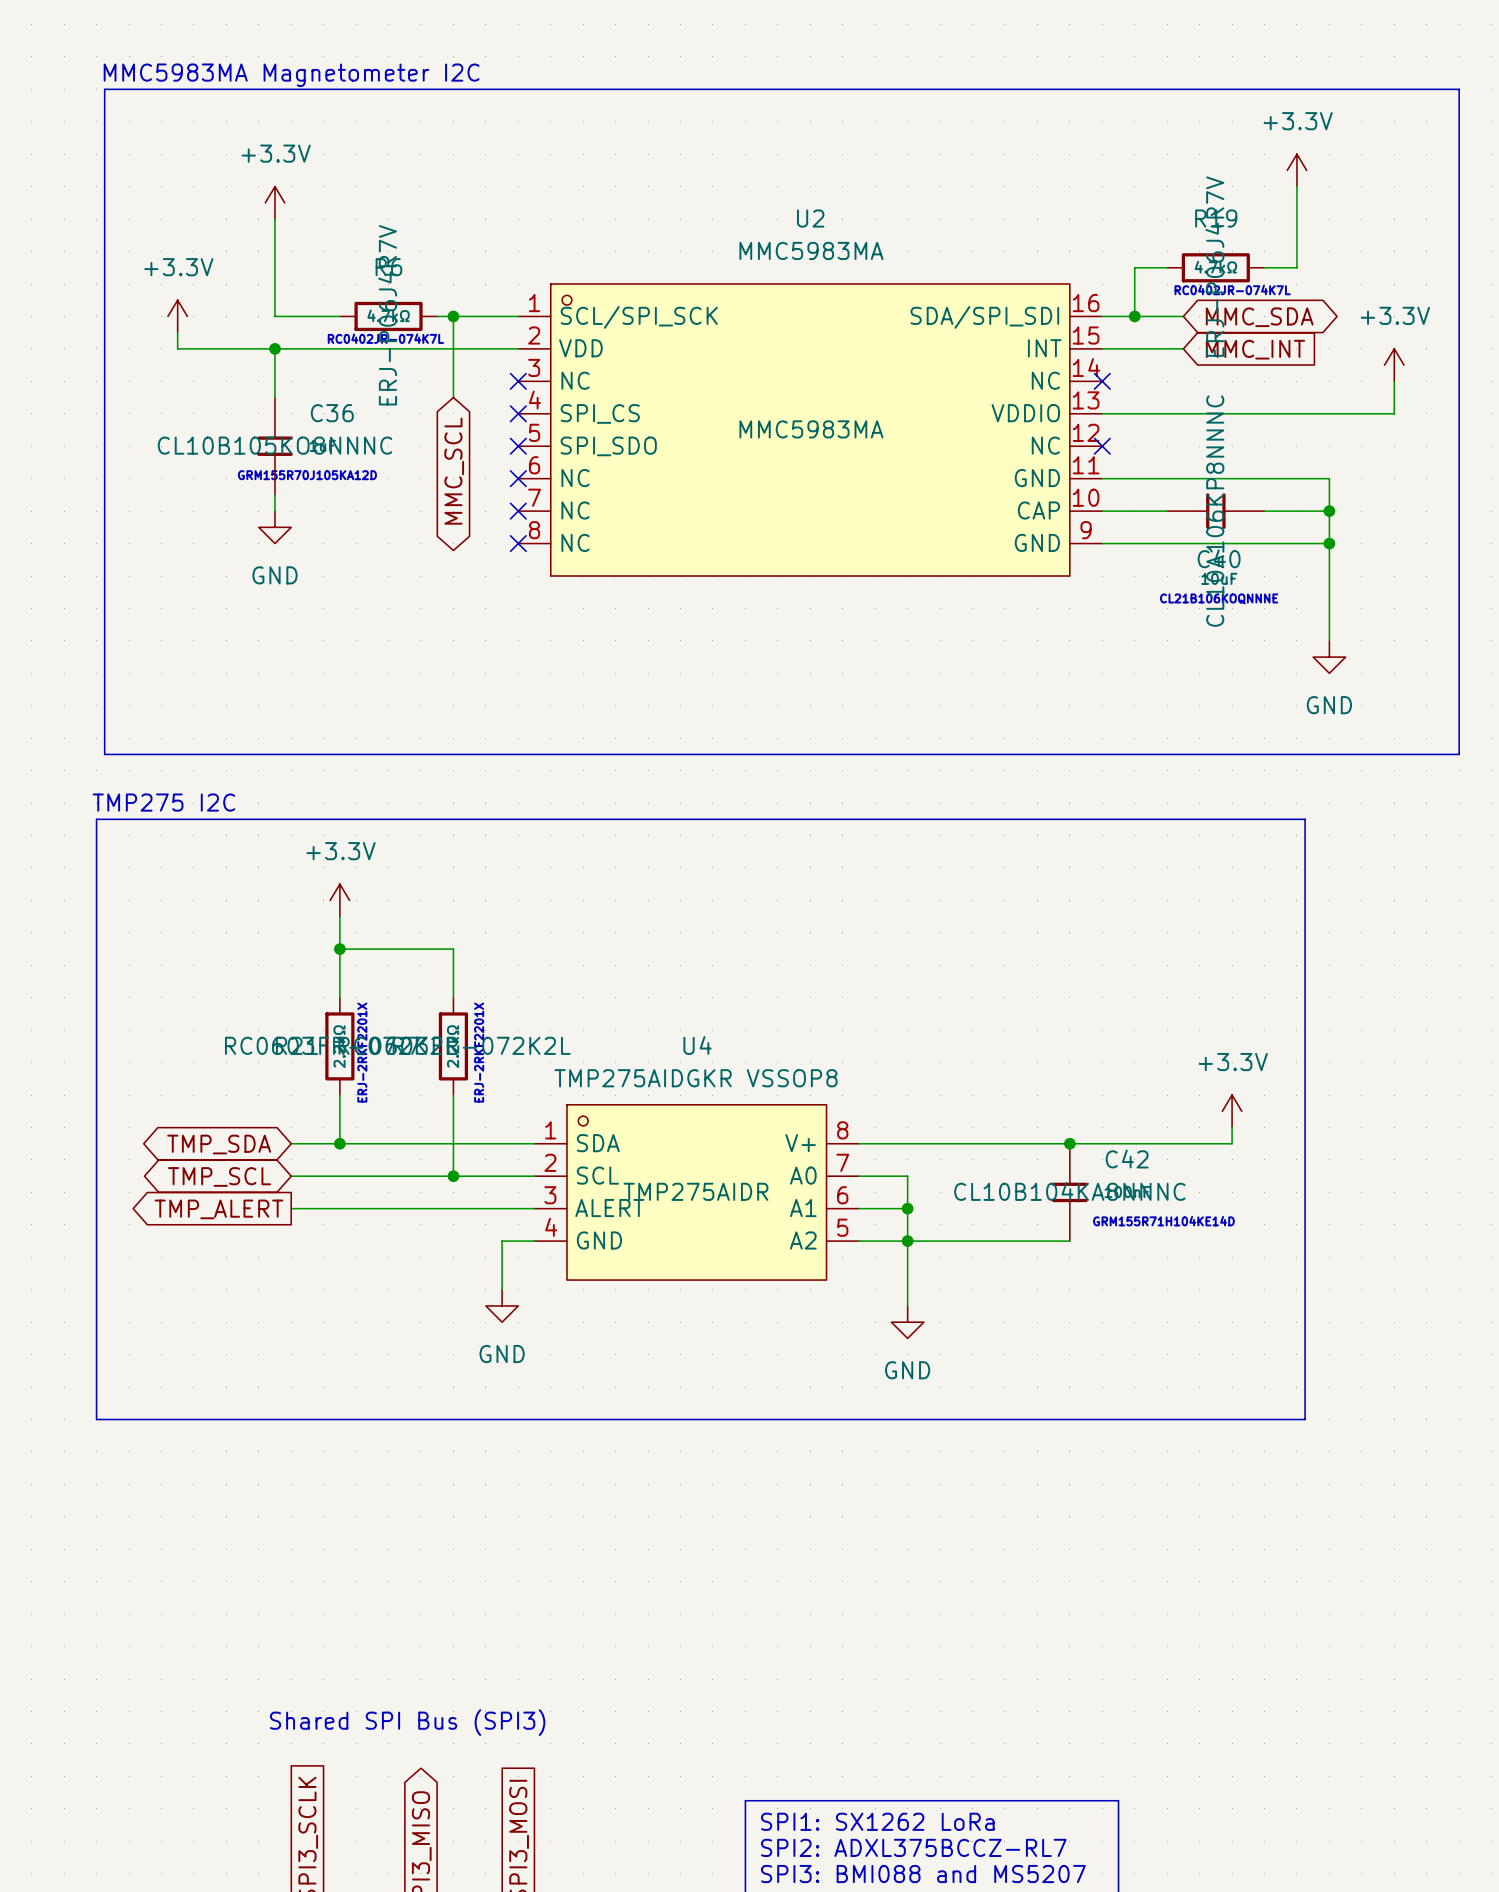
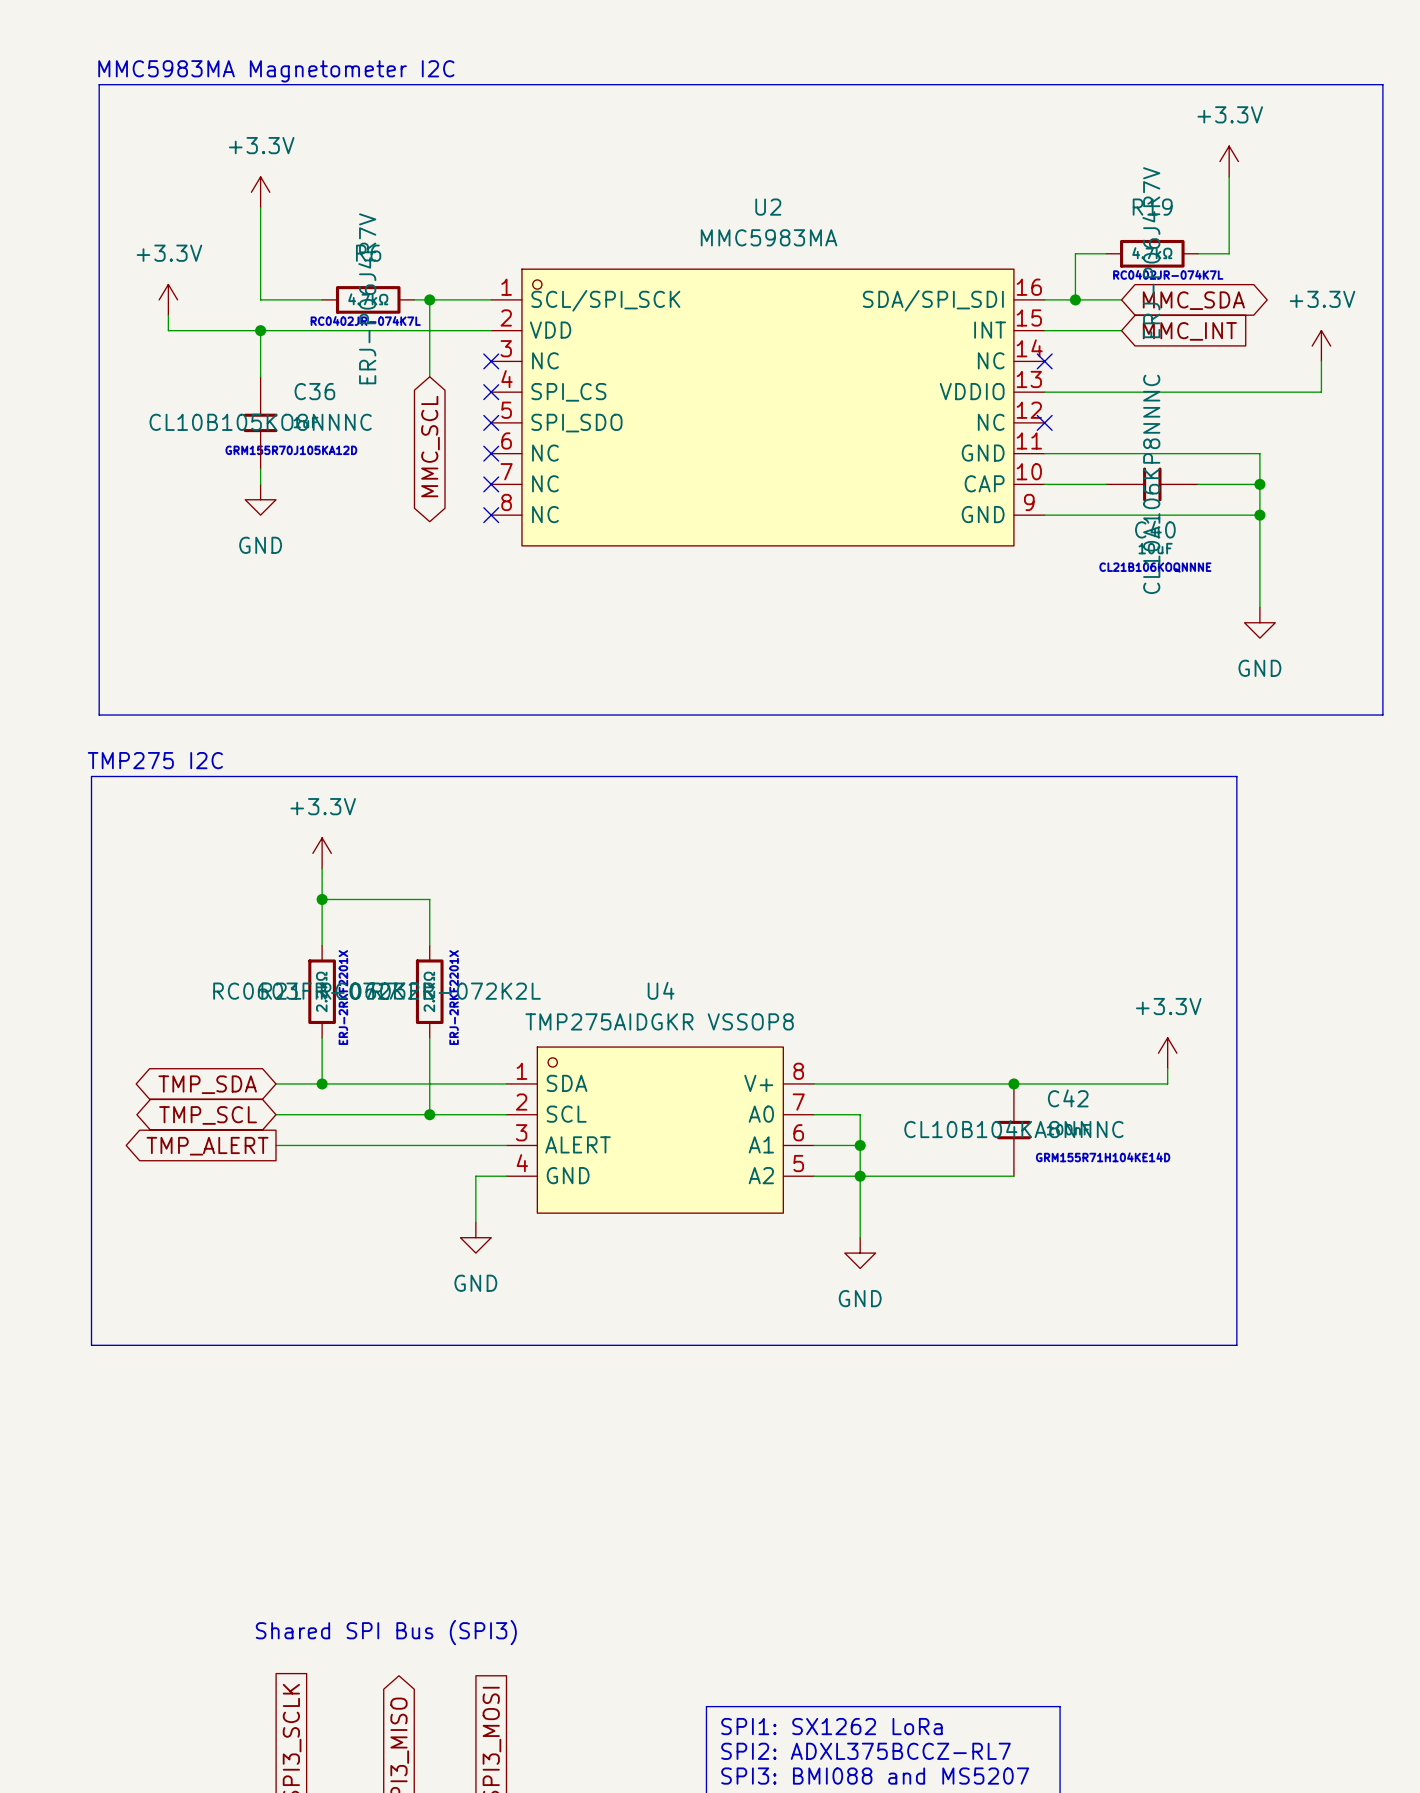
U2 text: MMC5983MA (811, 429) -> none
U4 text: TMP275AIDR (695, 1191) -> none

